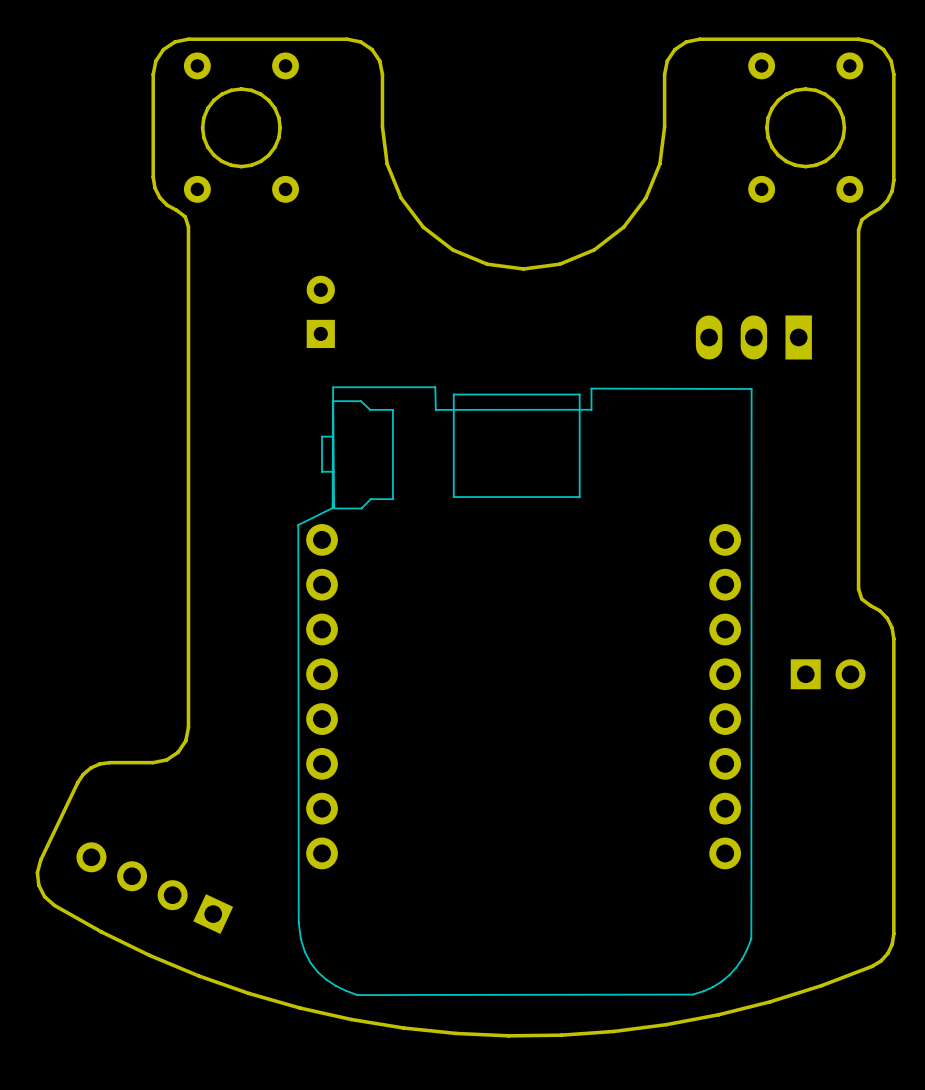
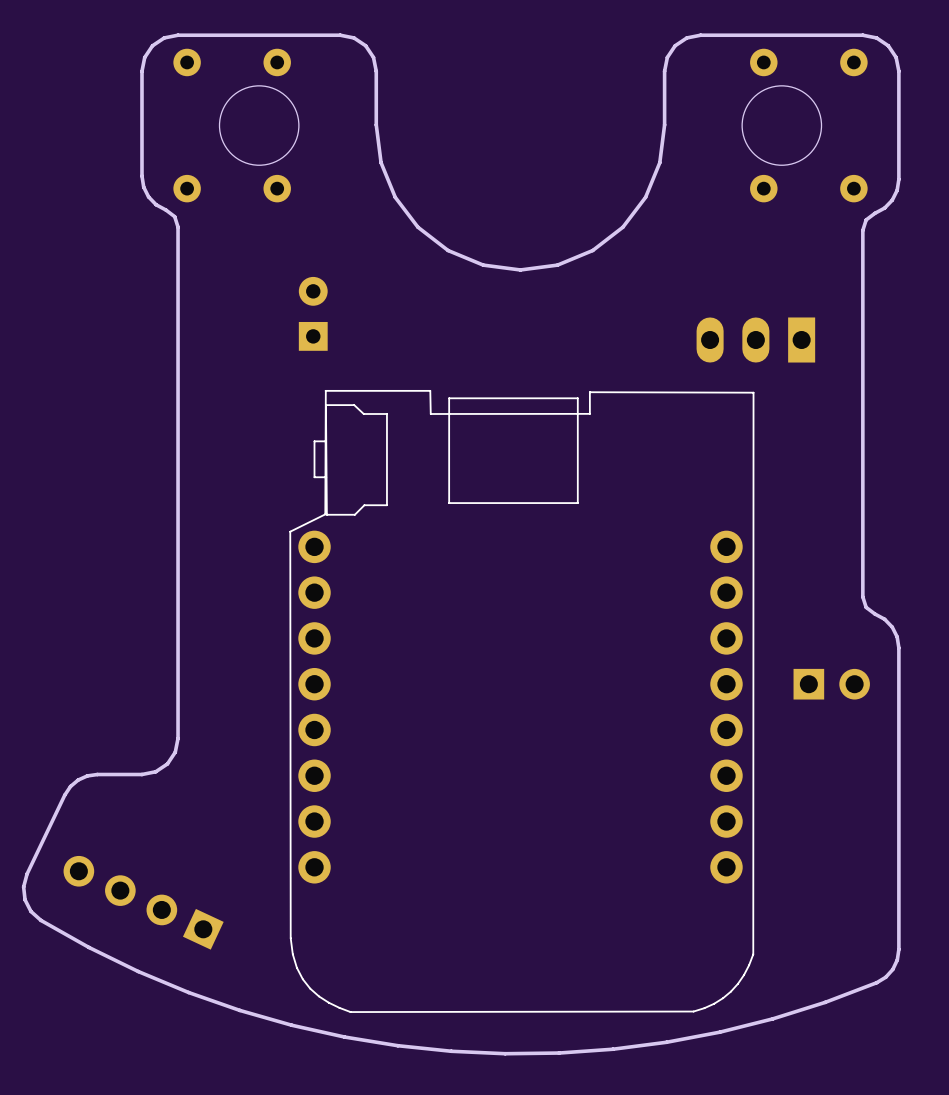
round board edge: none -> [219, 85, 300, 166]
round board edge: none -> [741, 85, 822, 166]
board edge: (241, 89) (231, 90) (214, 100) (207, 108) (202, 127) (207, 147) (214, 155) (231, 165) (241, 166) (251, 165) (268, 155) (274, 147) (280, 127) (274, 108) (268, 100) (251, 90) (241, 89) -> none
board edge: (805, 89) (795, 90) (778, 100) (772, 108) (766, 127) (772, 147) (778, 155) (795, 165) (805, 166) (815, 165) (833, 155) (839, 147) (844, 127) (839, 108) (833, 100) (815, 90) (805, 89) -> none

